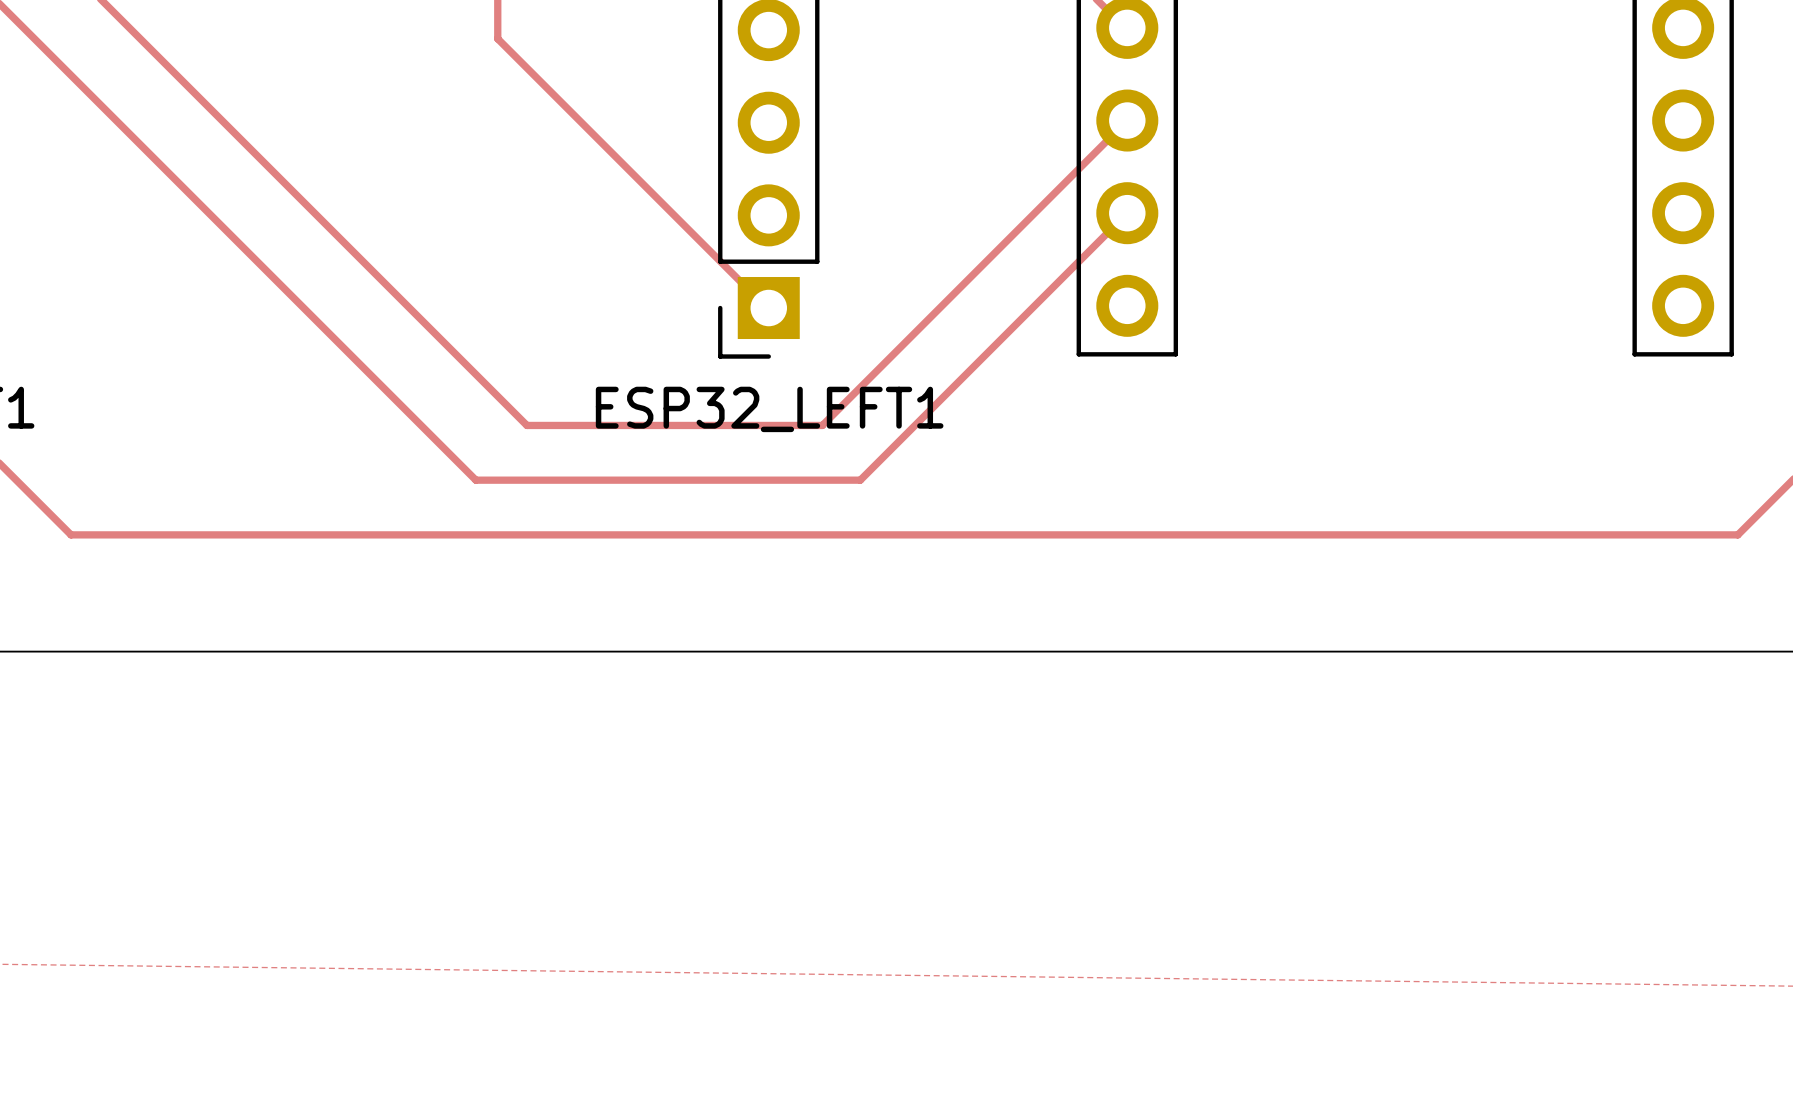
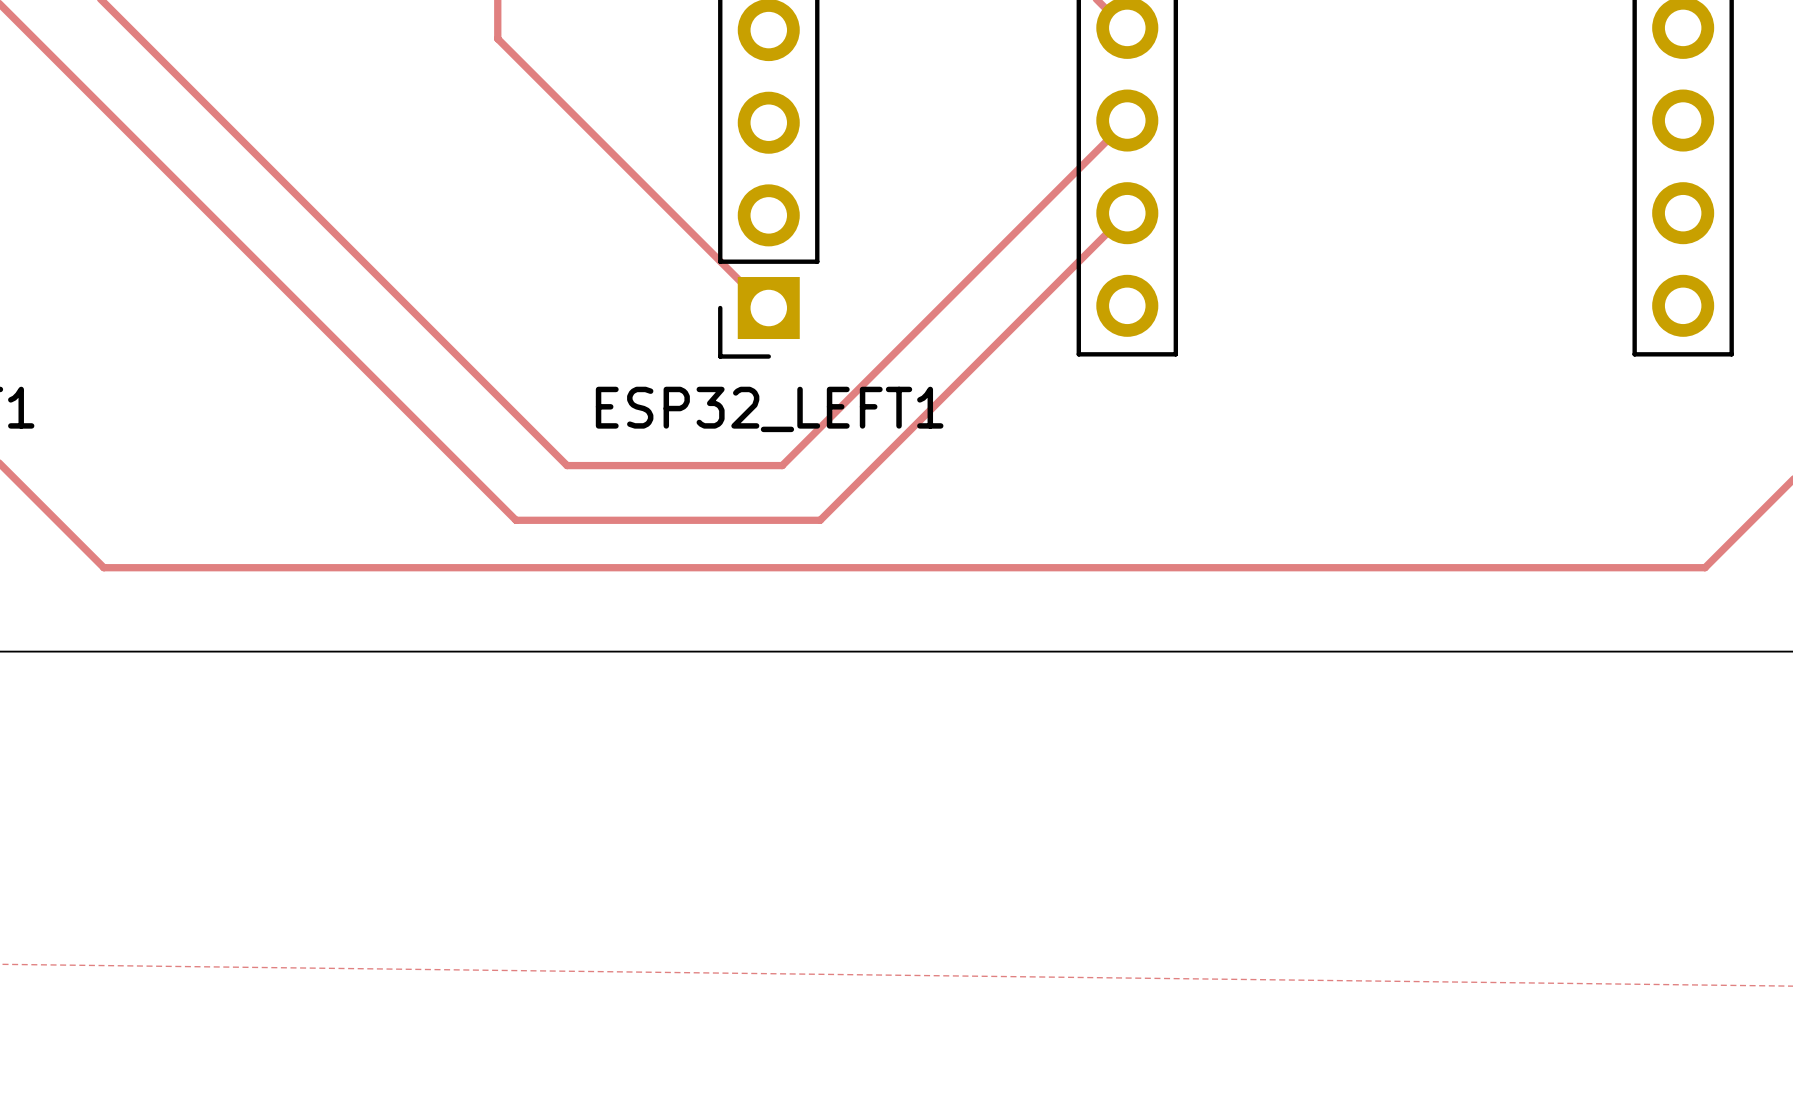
track: (526, 425) (822, 425) -> (526, 425) (567, 465) (782, 465) (822, 425)
track: (475, 480) (860, 480) -> (475, 480) (516, 520) (820, 520) (860, 480)
track: (71, 534) (1737, 534) -> (71, 534) (103, 567) (1705, 567) (1737, 534)

